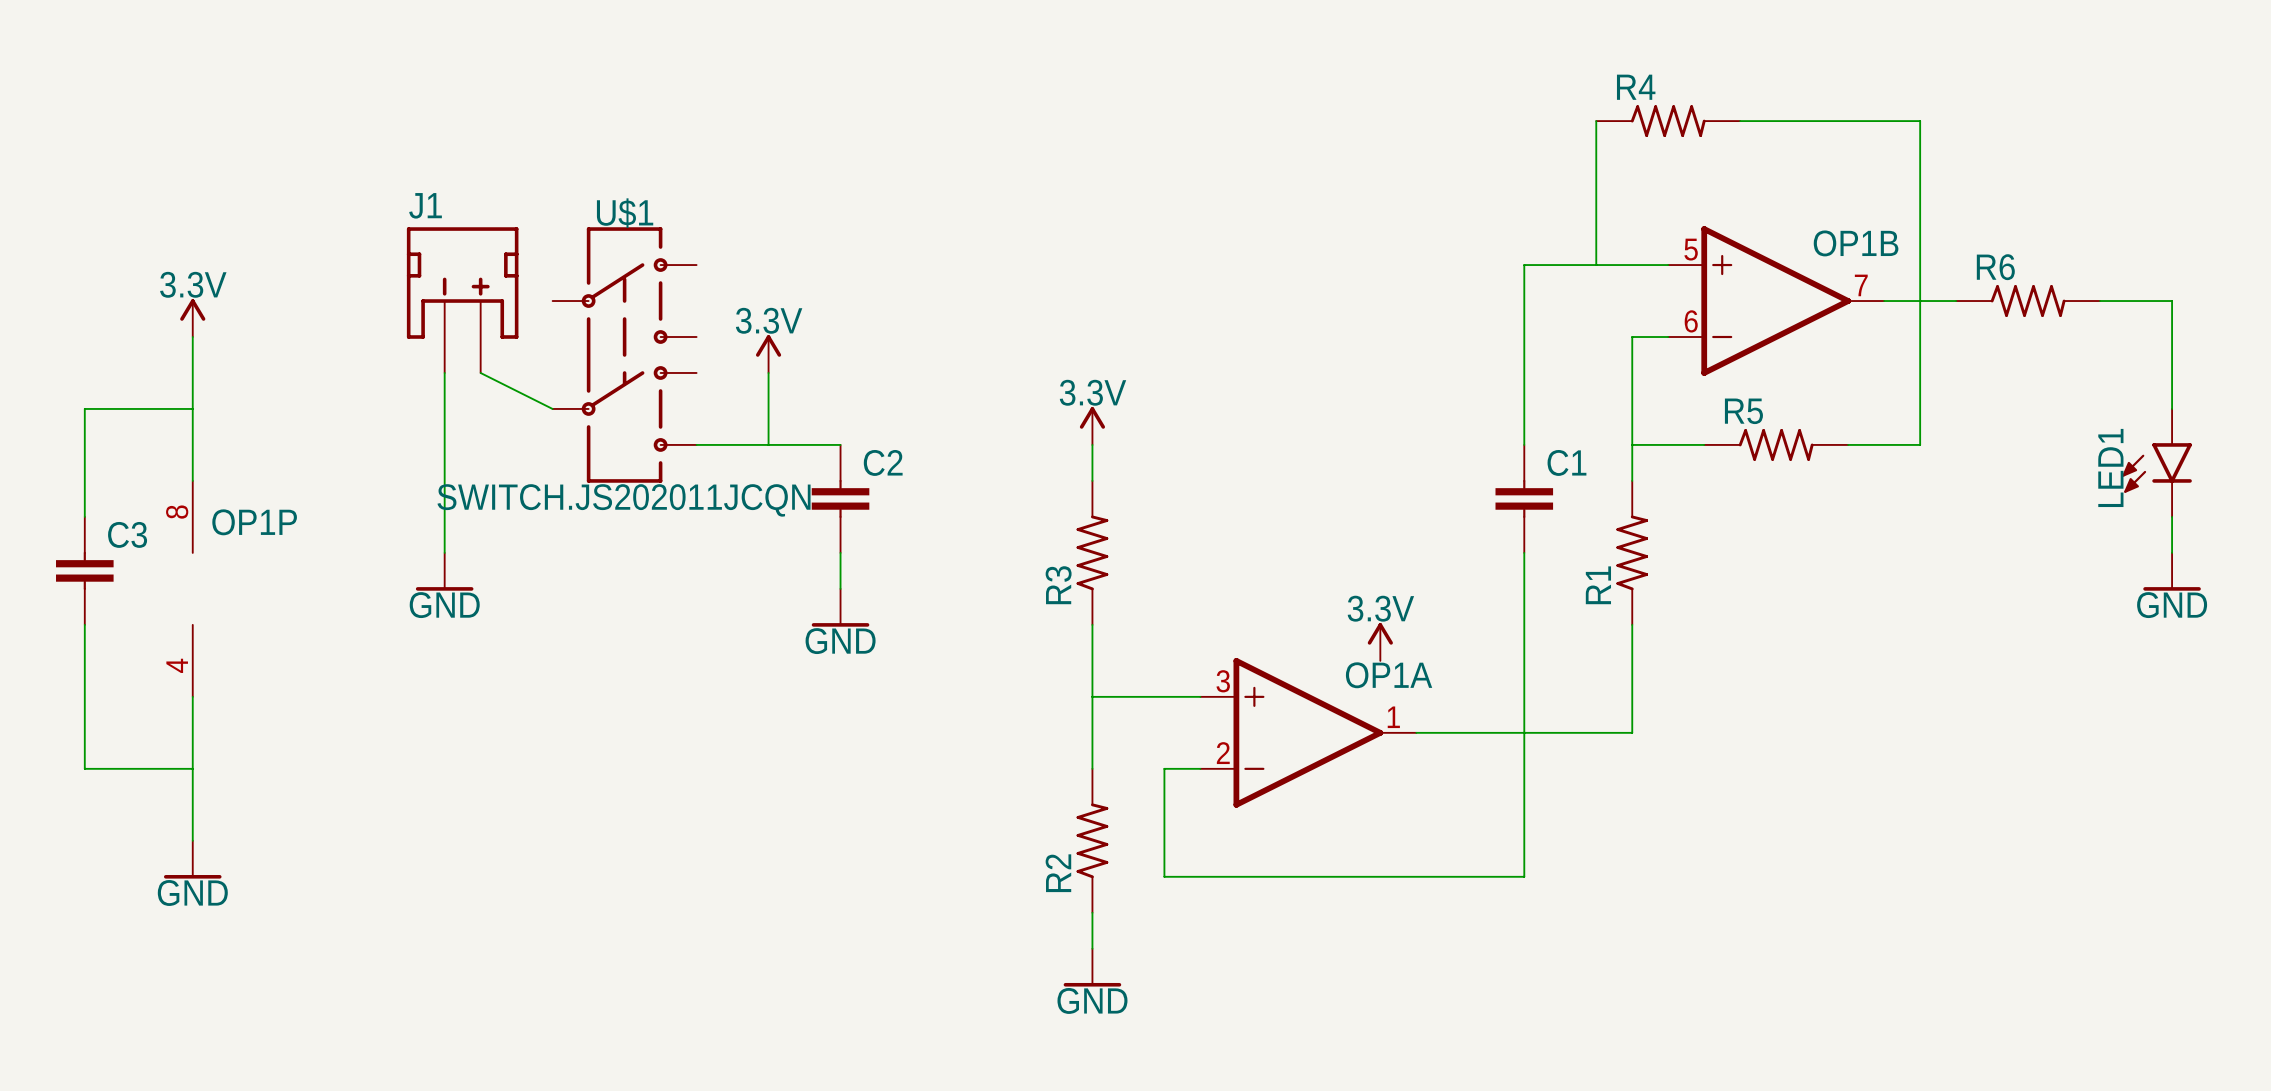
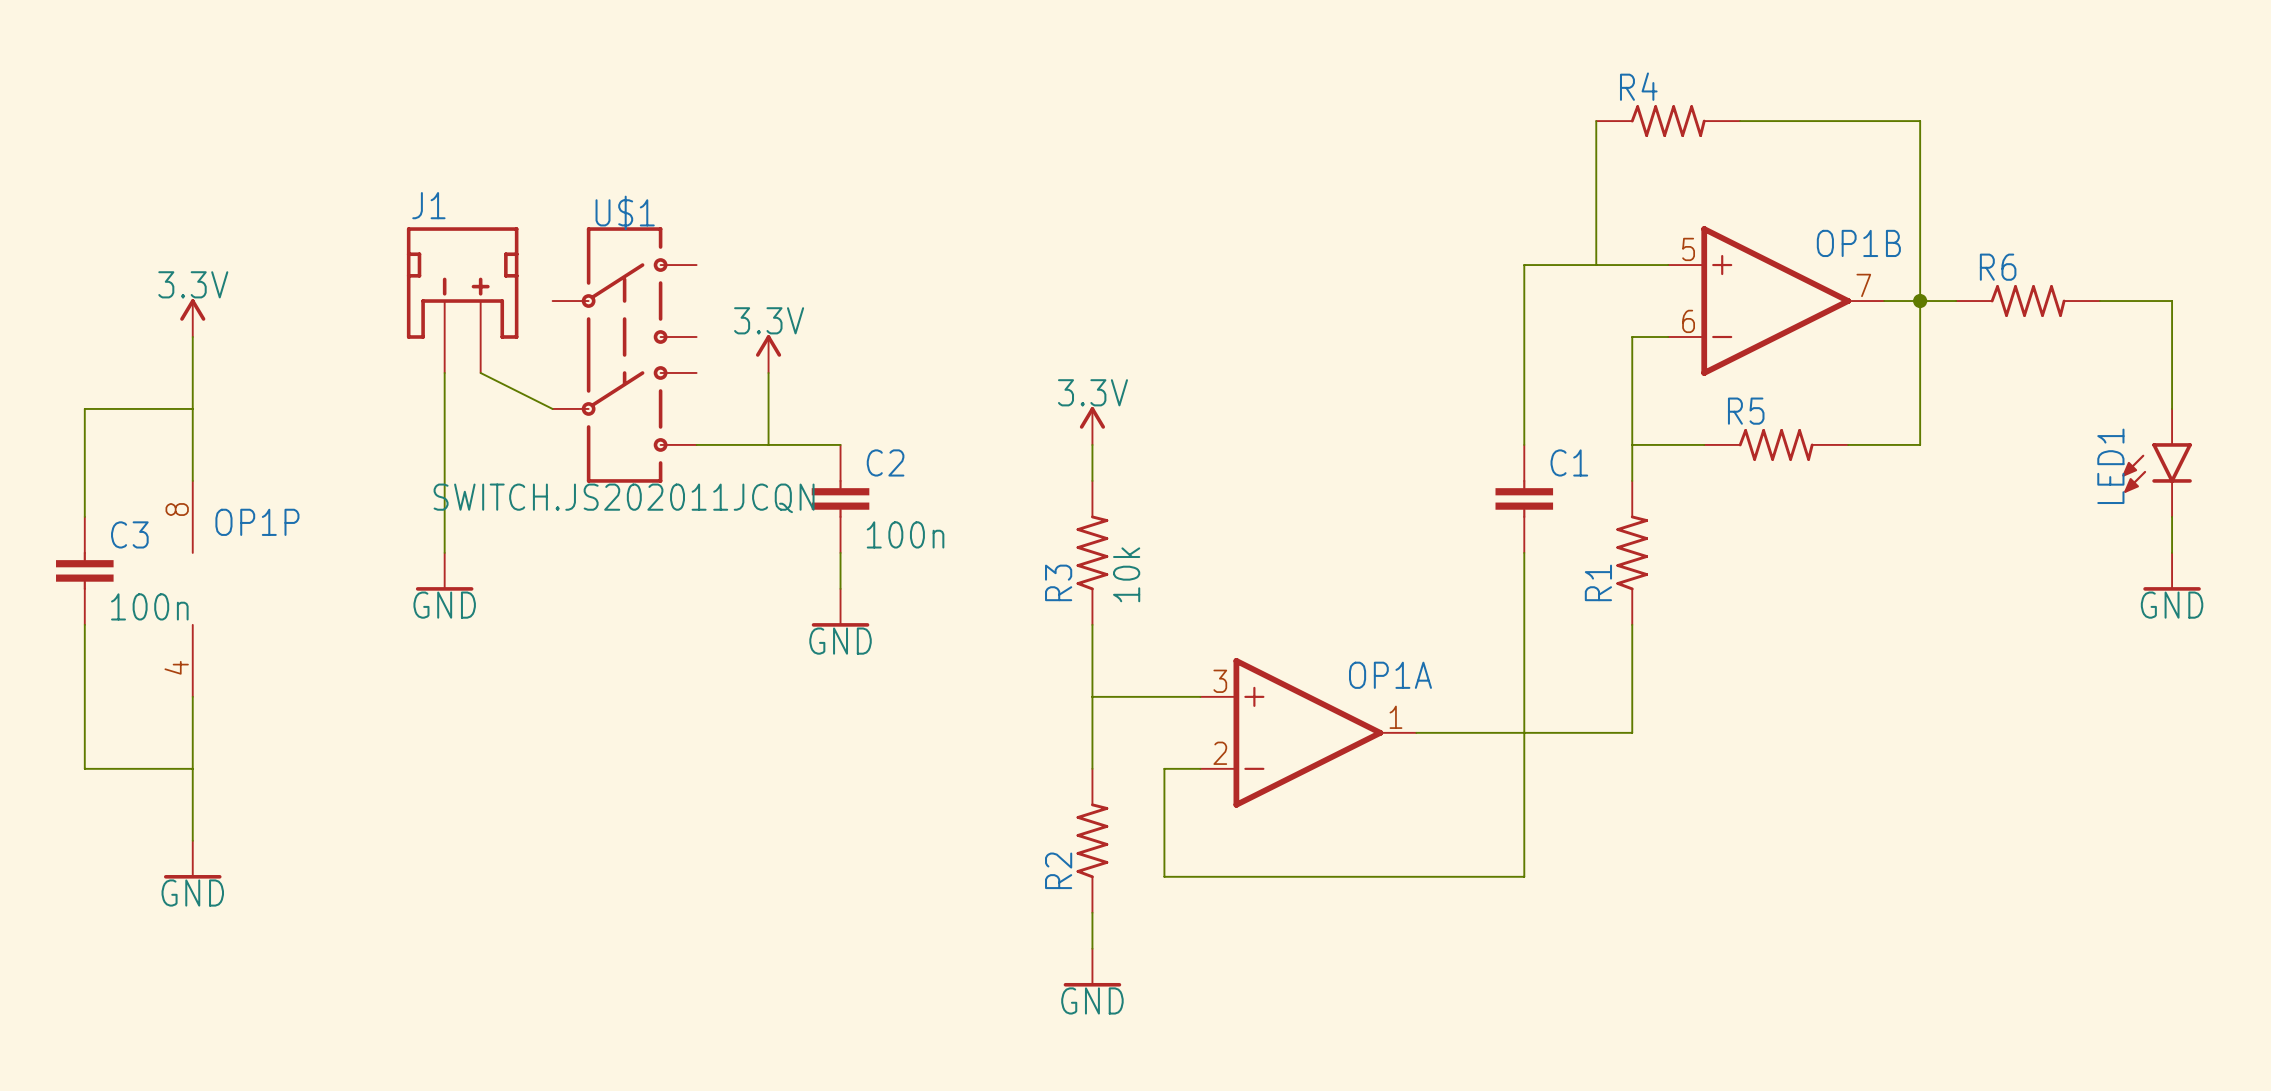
junction: none -> (1920, 301)
C2 value: none -> 100n (905, 534)
R3 value: none -> 10k (1126, 574)
C3 value: none -> 100n (149, 606)
power symbol: 3.3V (1380, 641) -> none

